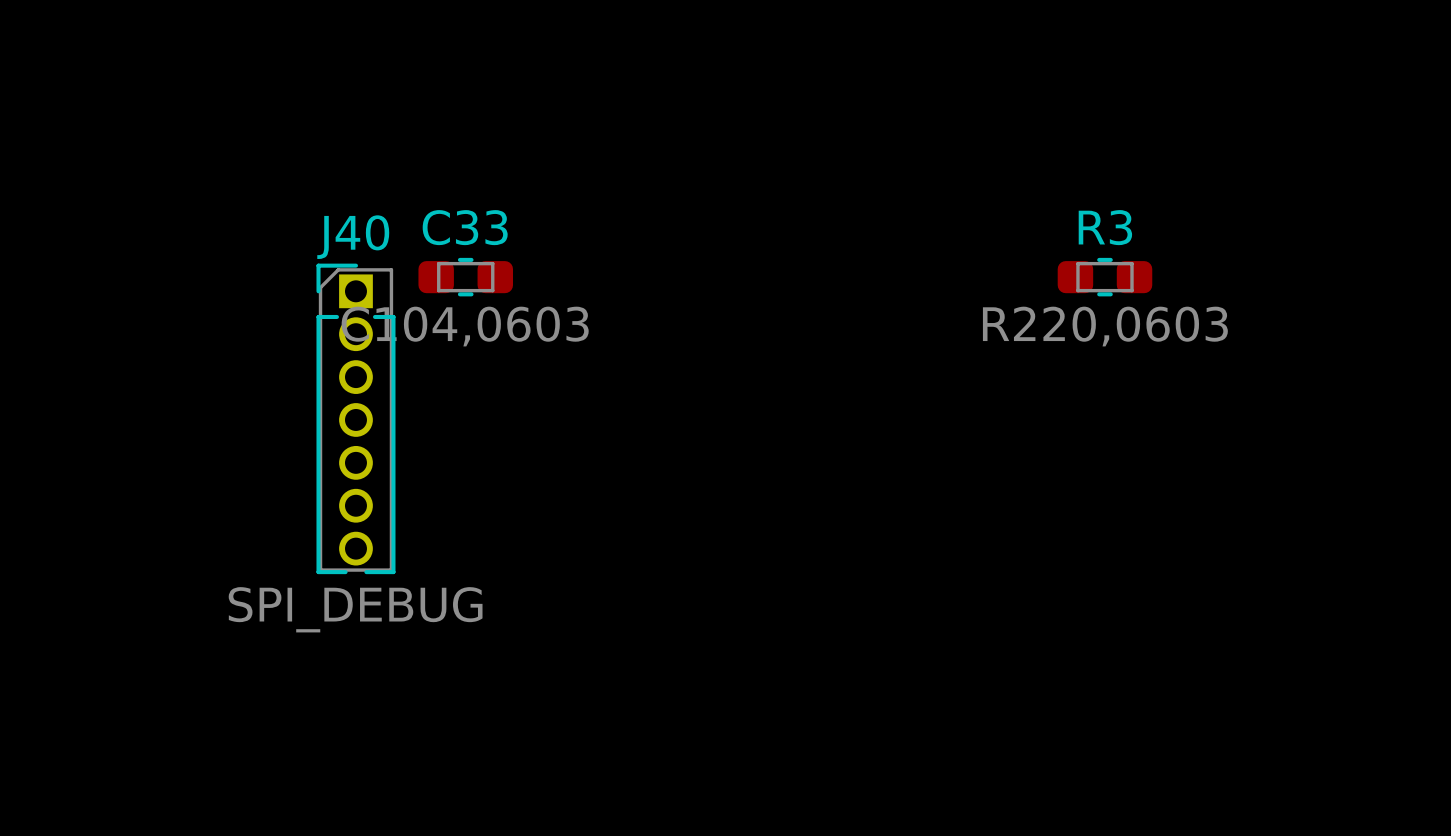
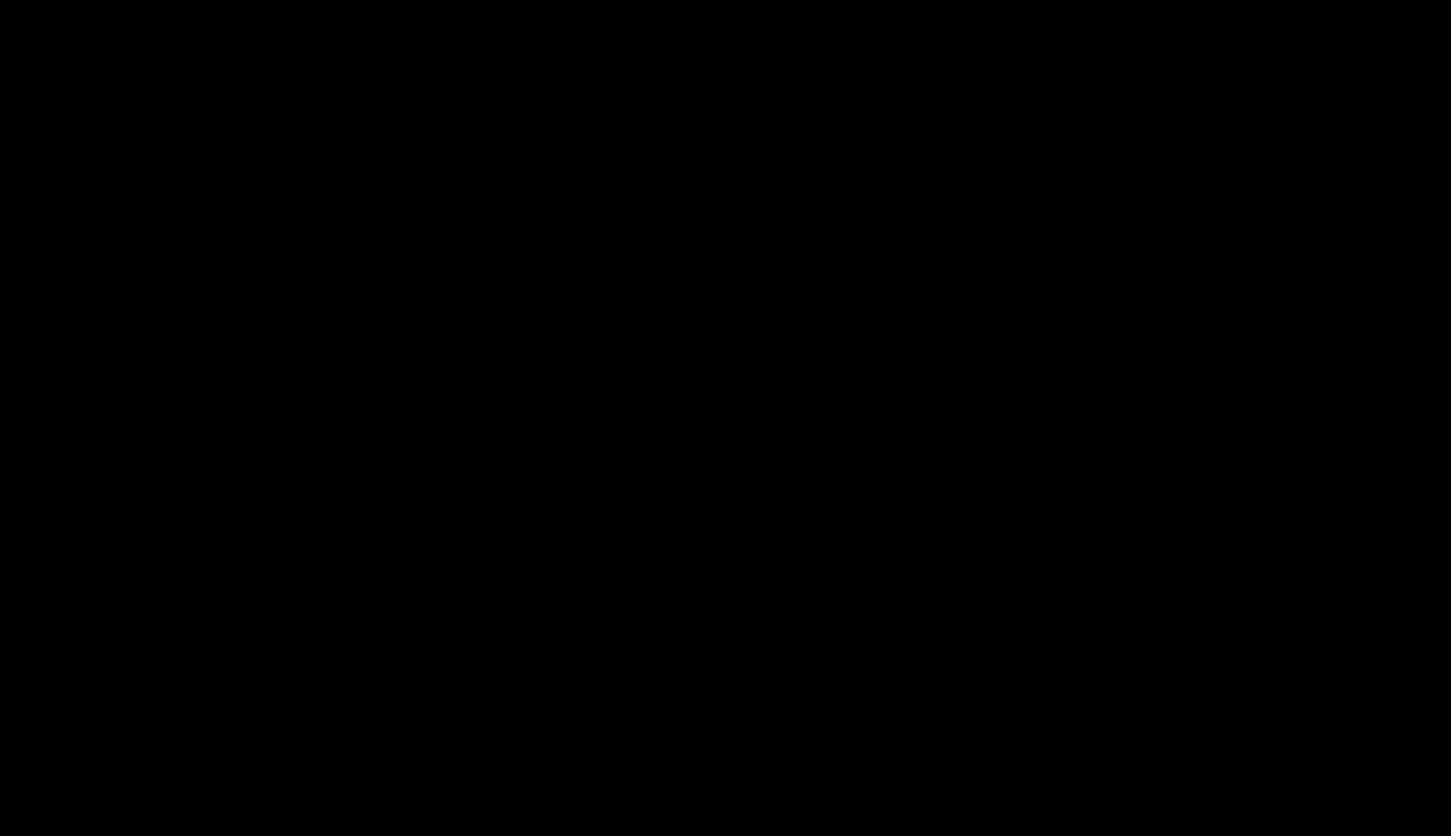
C33: C104,0603 (465, 277) -> none
R3: R220,0603 (1104, 277) -> none
J40: SPI_DEBUG (355, 418) -> none

